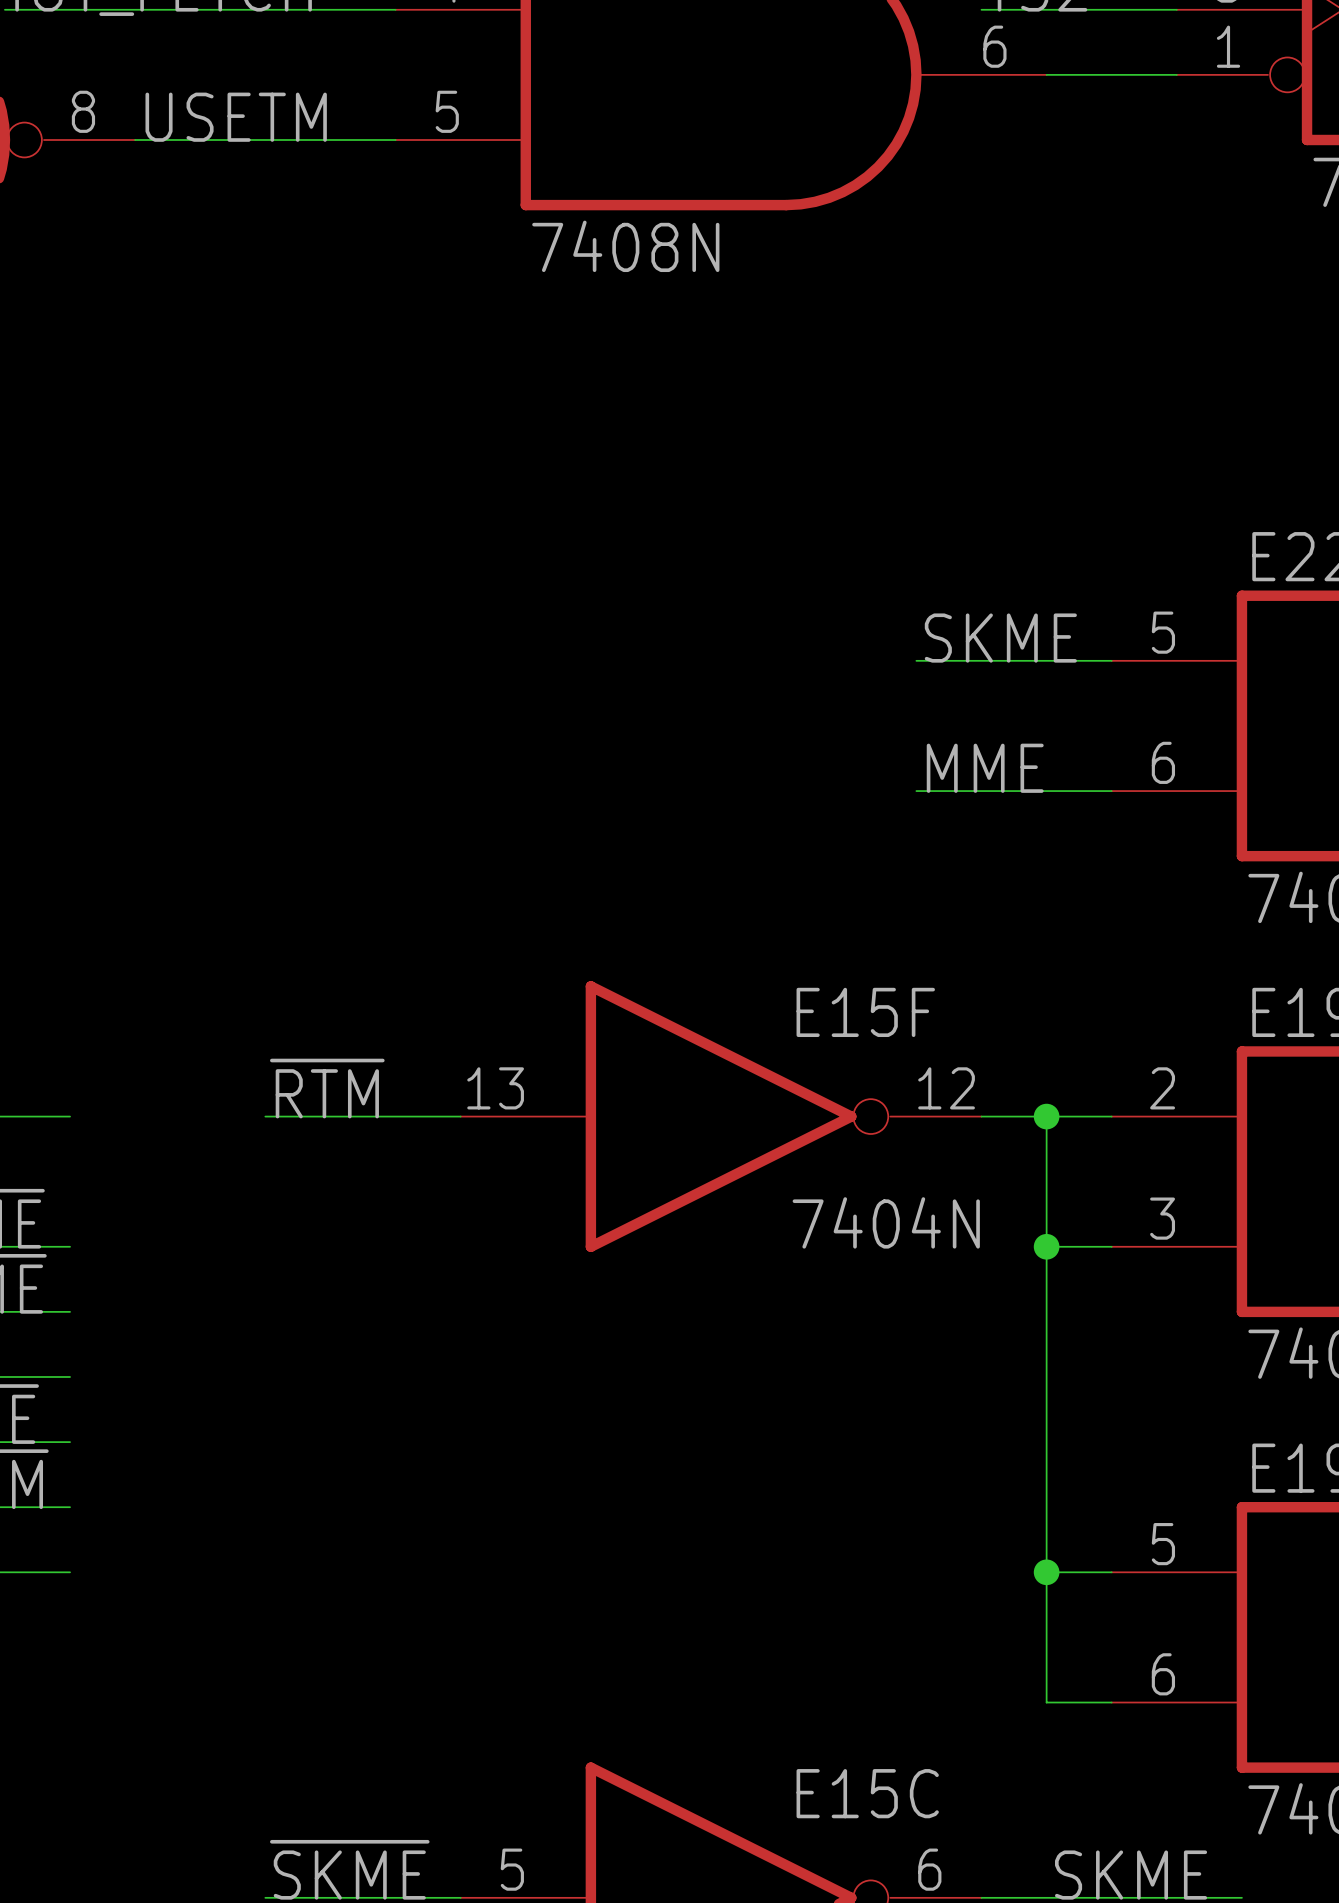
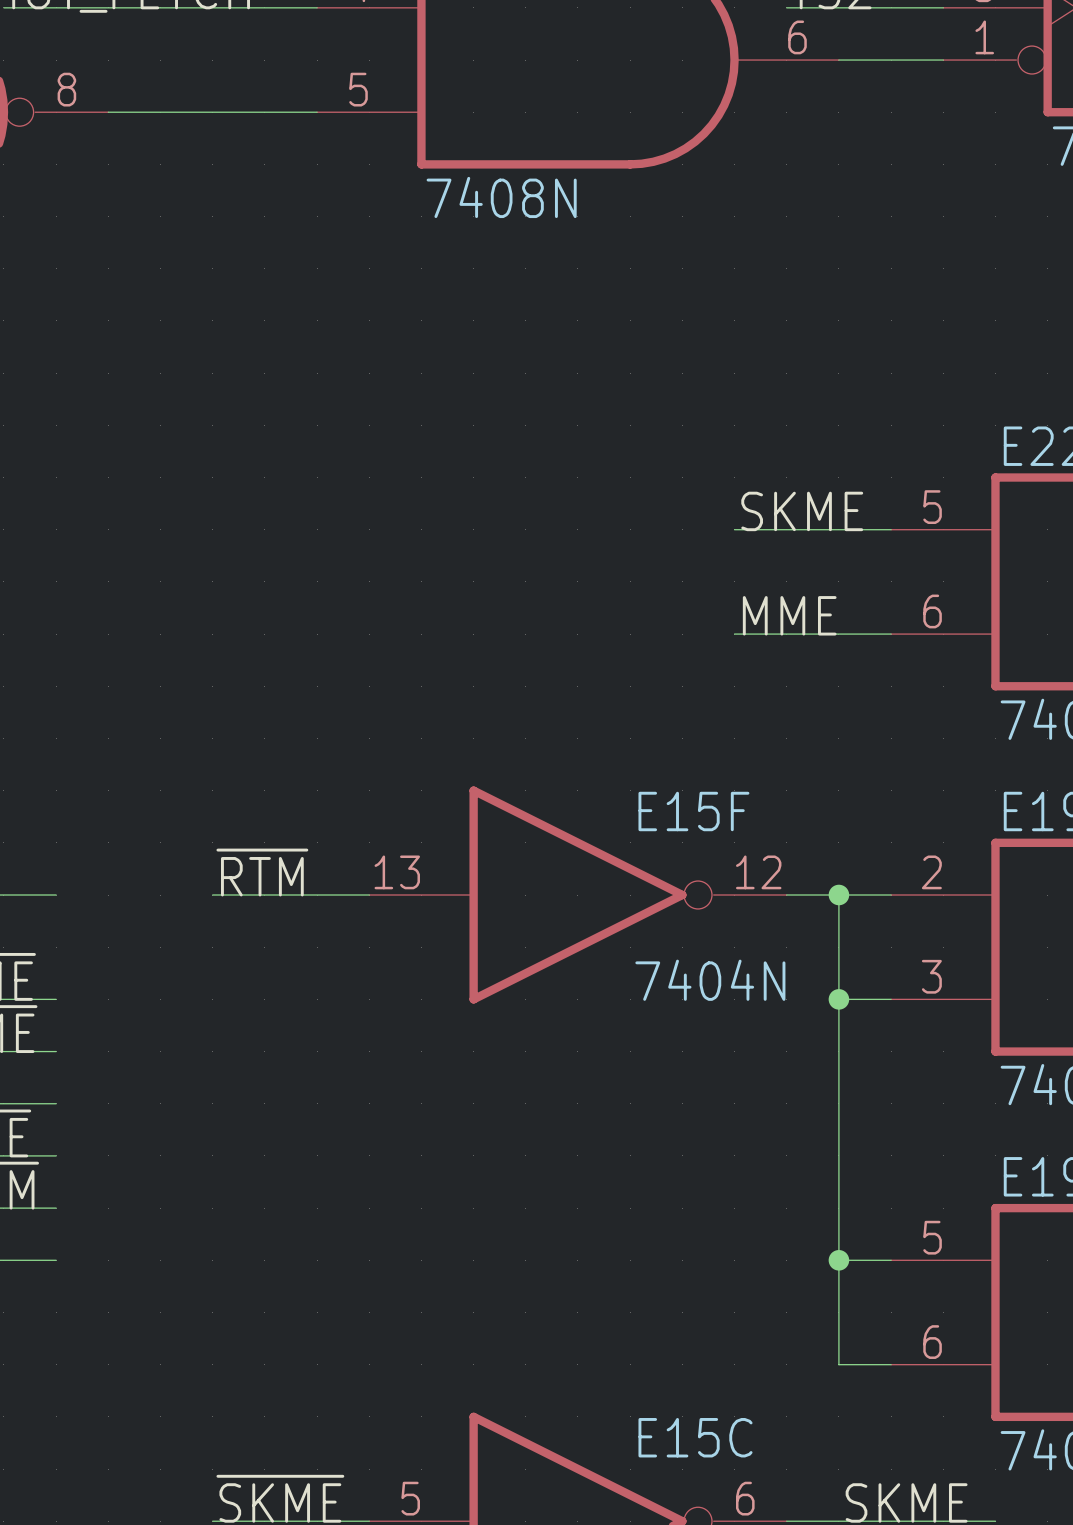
label: USETM (236, 117) -> none

